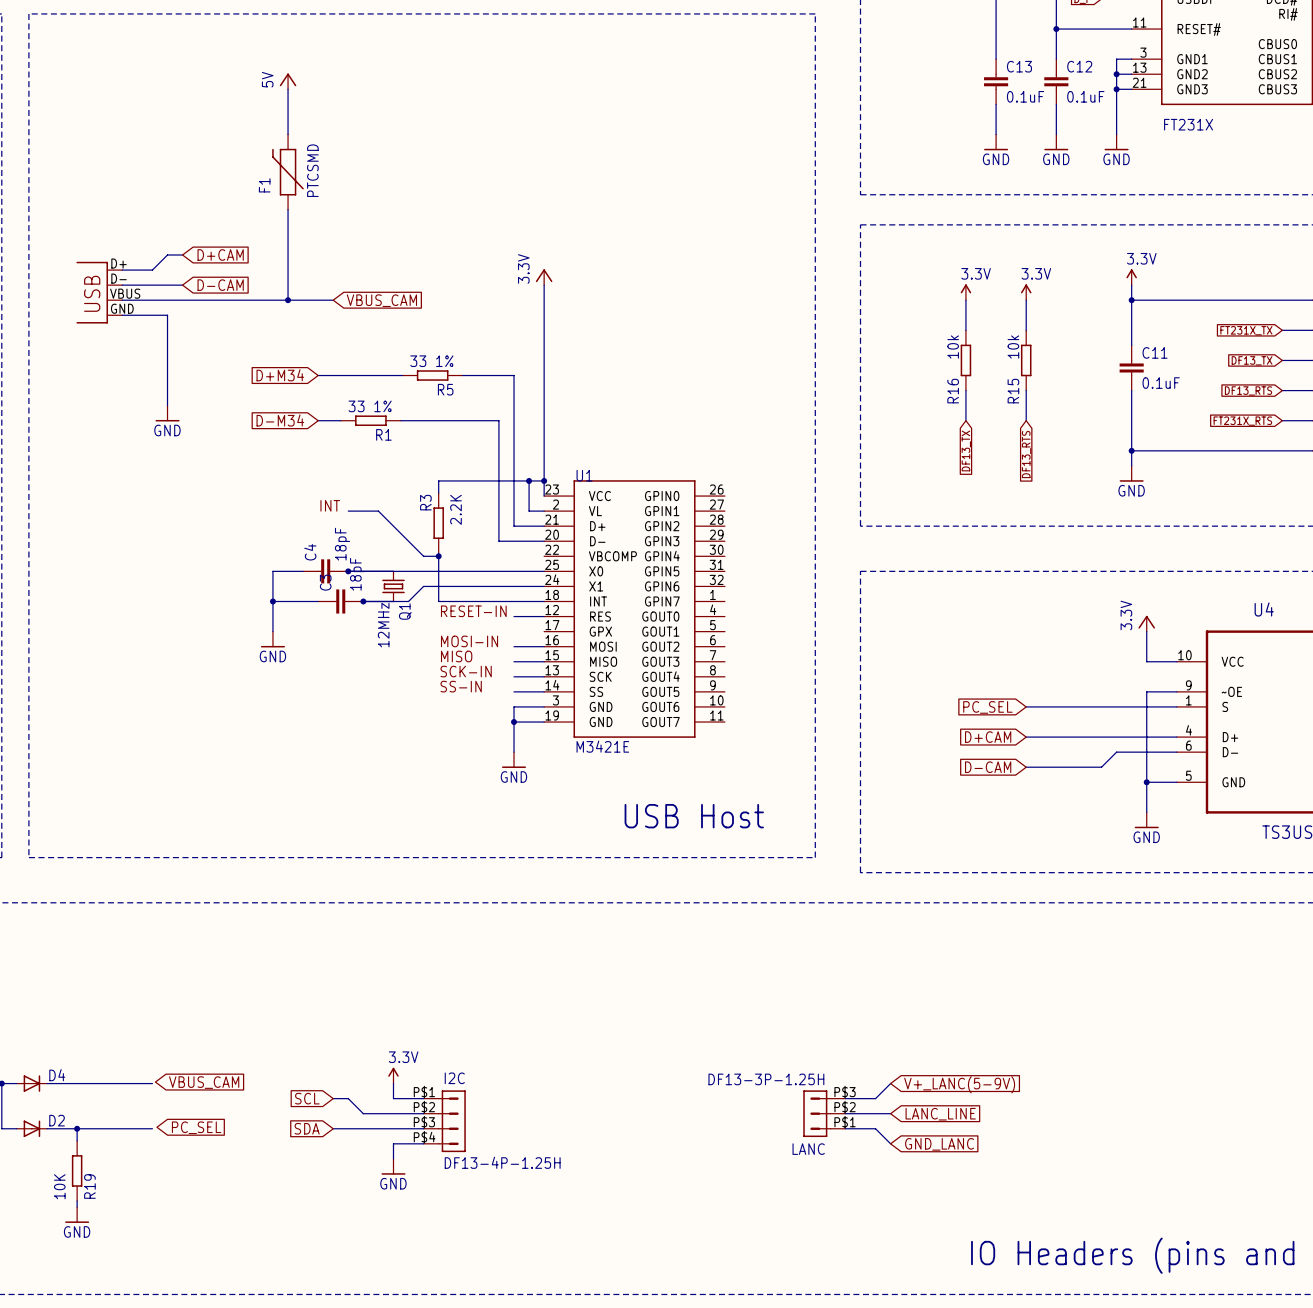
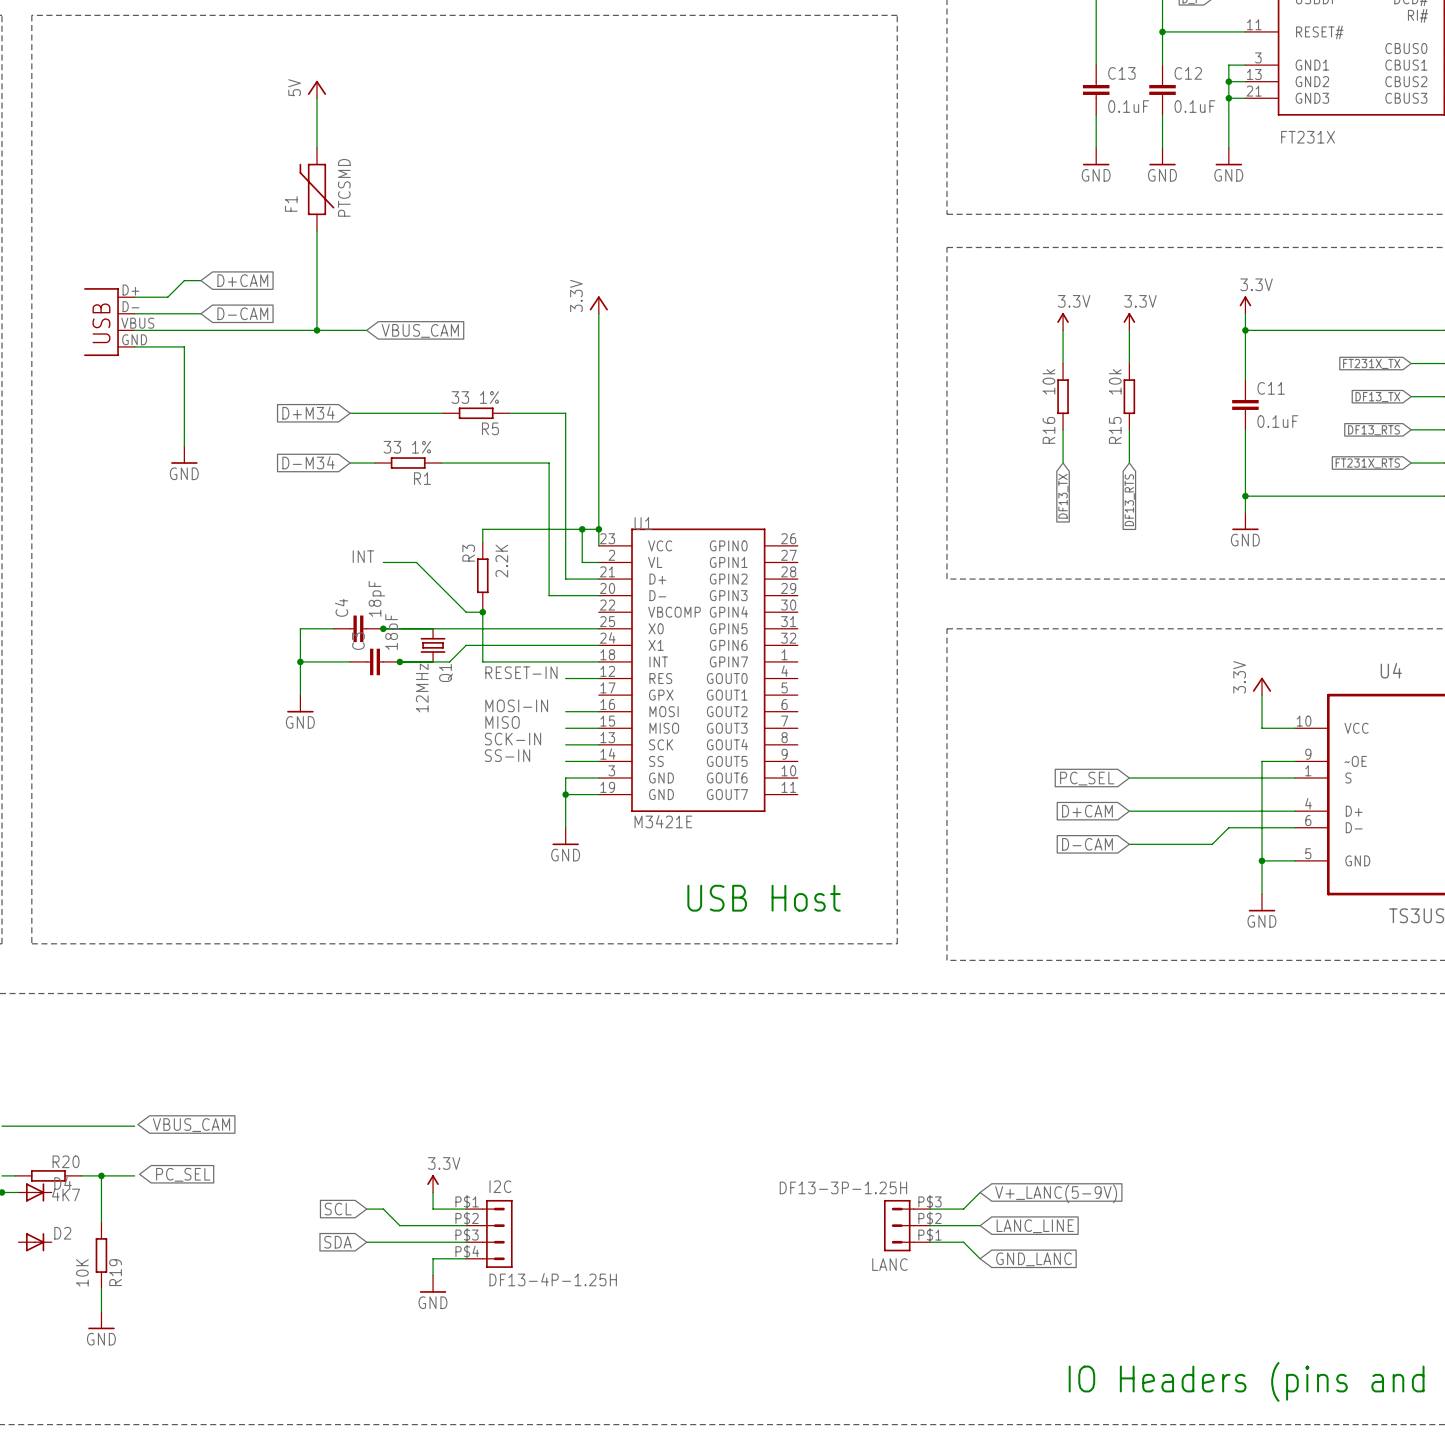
wire: none -> (1, 1126) (134, 1126)
wire: none -> (1, 1175) (15, 1175)
R20: none -> 4K7 (48, 1175)
wire: none -> (81, 1175) (134, 1175)
wire: none -> (101, 1175) (101, 1222)
junction: none -> (101, 1175)
global label position: VBUS_CAM (204, 1082) -> VBUS_CAM (191, 1125)
wire: (1, 1083) (1, 1128) (16, 1128) -> none
wire: (46, 1083) (152, 1083) -> none
global label position: PC_SEL (196, 1127) -> PC_SEL (183, 1174)
wire: (46, 1128) (152, 1128) -> none
wire: (77, 1128) (77, 1140) -> none
junction: (77, 1128) -> none
R19 position: (77, 1170) -> (101, 1255)
wire: none -> (101, 1288) (101, 1311)
wire: (77, 1201) (77, 1207) -> none
power symbol position: GND (77, 1215) -> GND (101, 1320)

